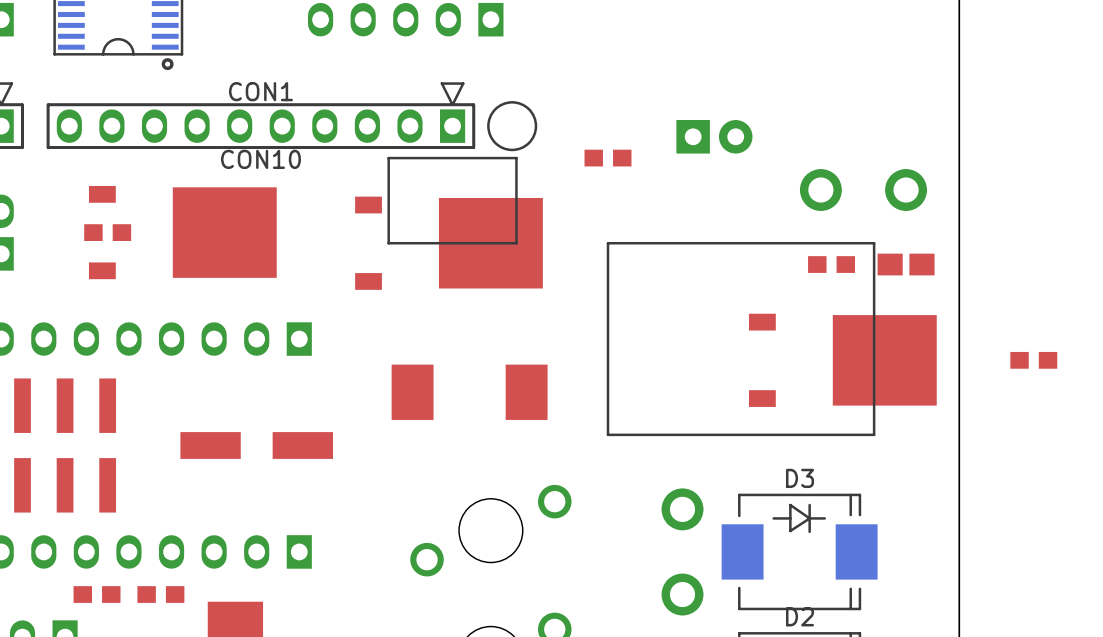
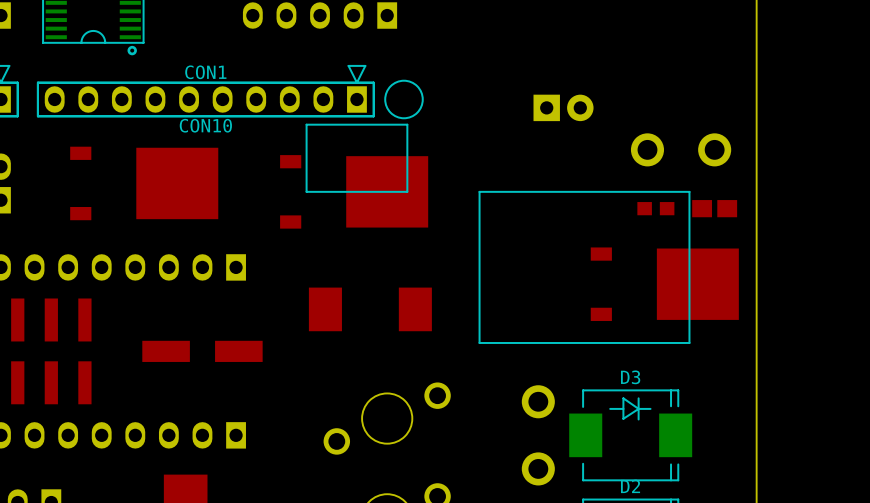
part: (607, 158) -> none
part: (107, 232) -> none
part: (1033, 360) -> none
part: (97, 594) -> none
part: (160, 594) -> none

